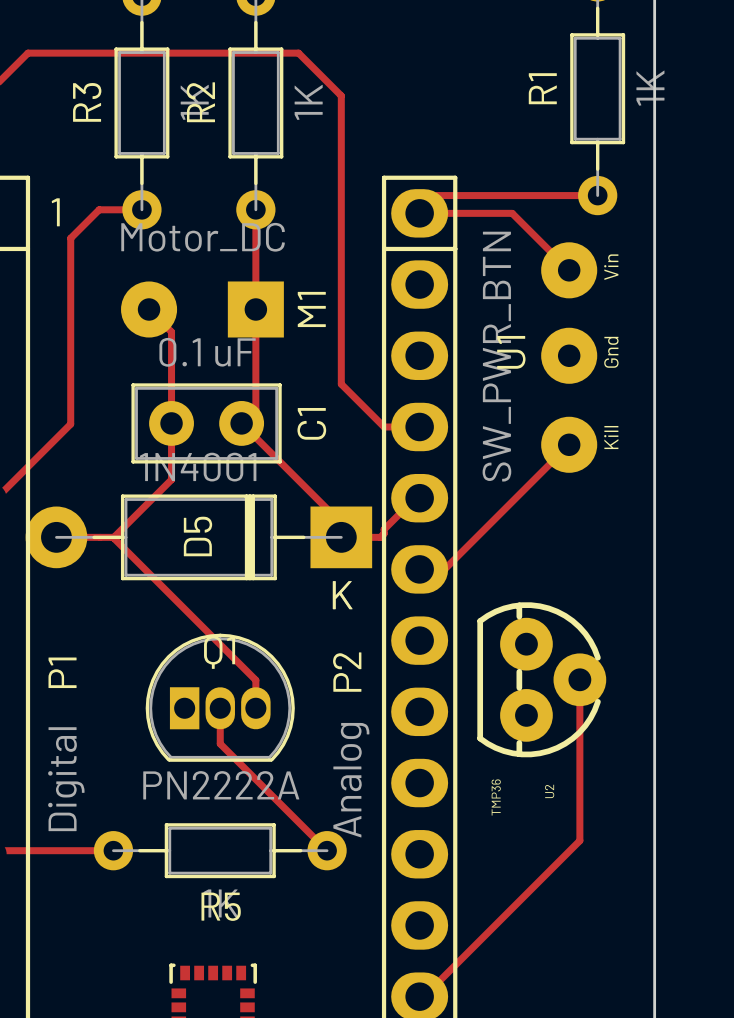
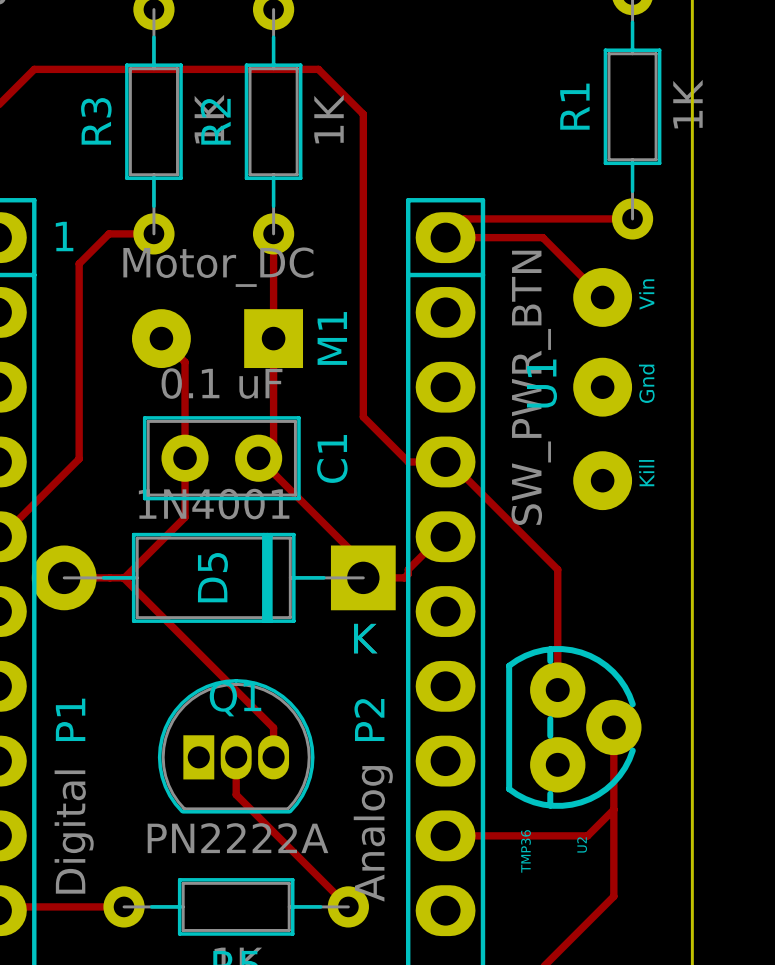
track: none -> (445, 461) (450, 461) (557, 569) (557, 690)
track: (569, 444) (444, 569) -> none
track: none -> (613, 809) (587, 835) (445, 835)

